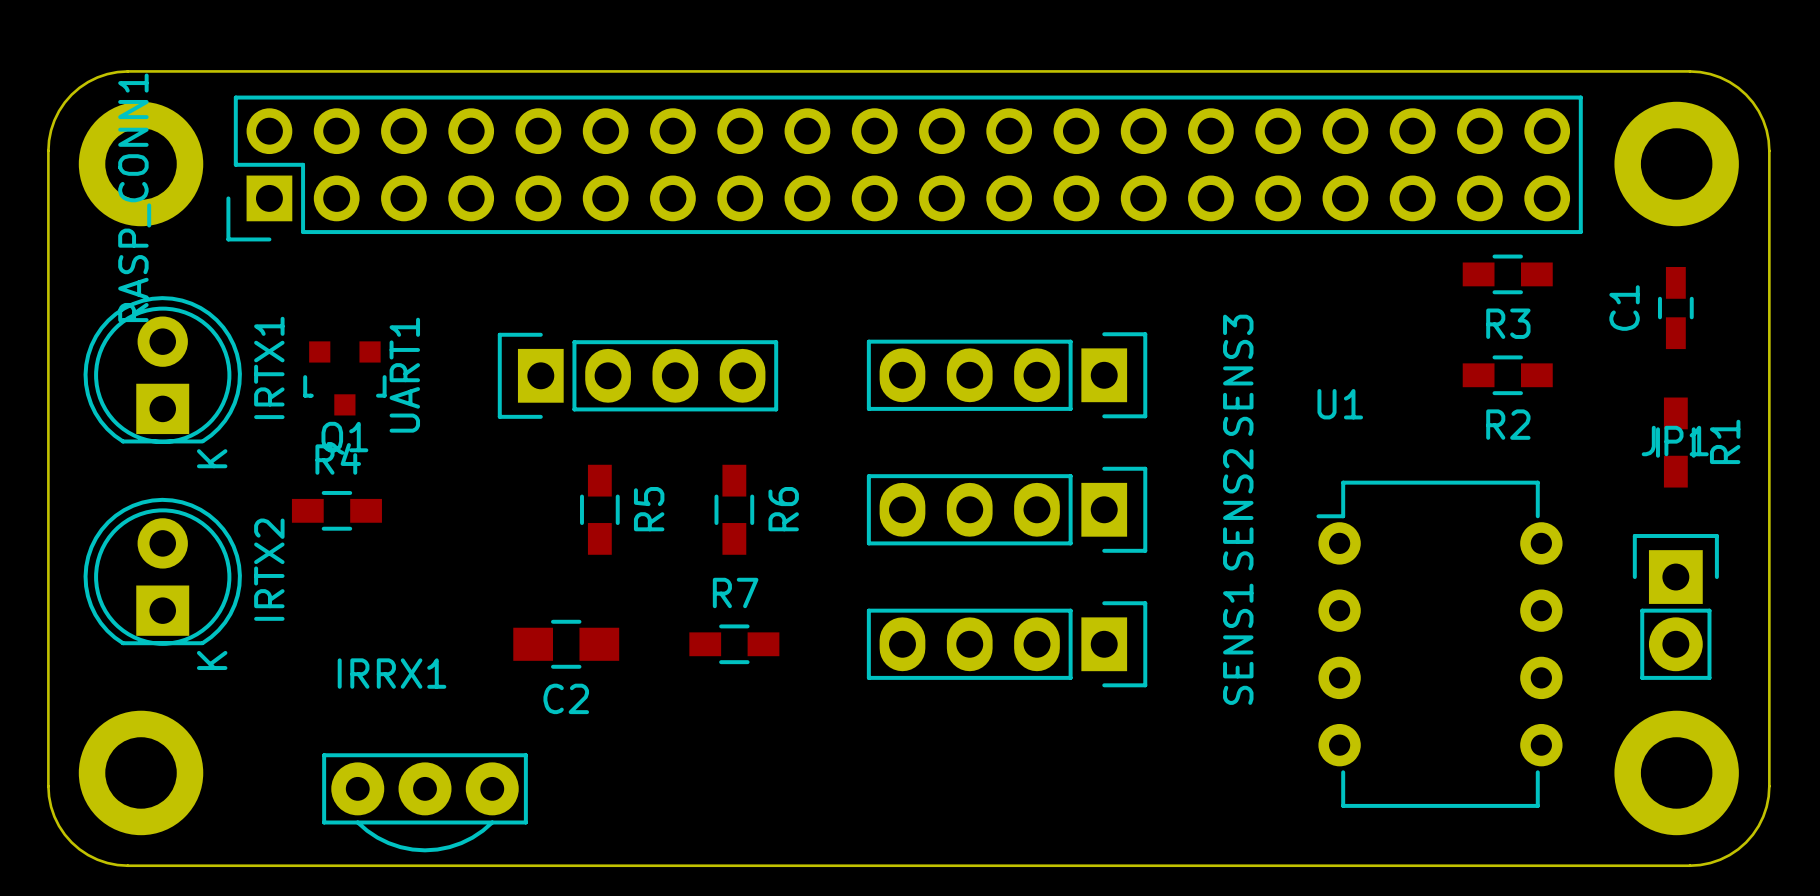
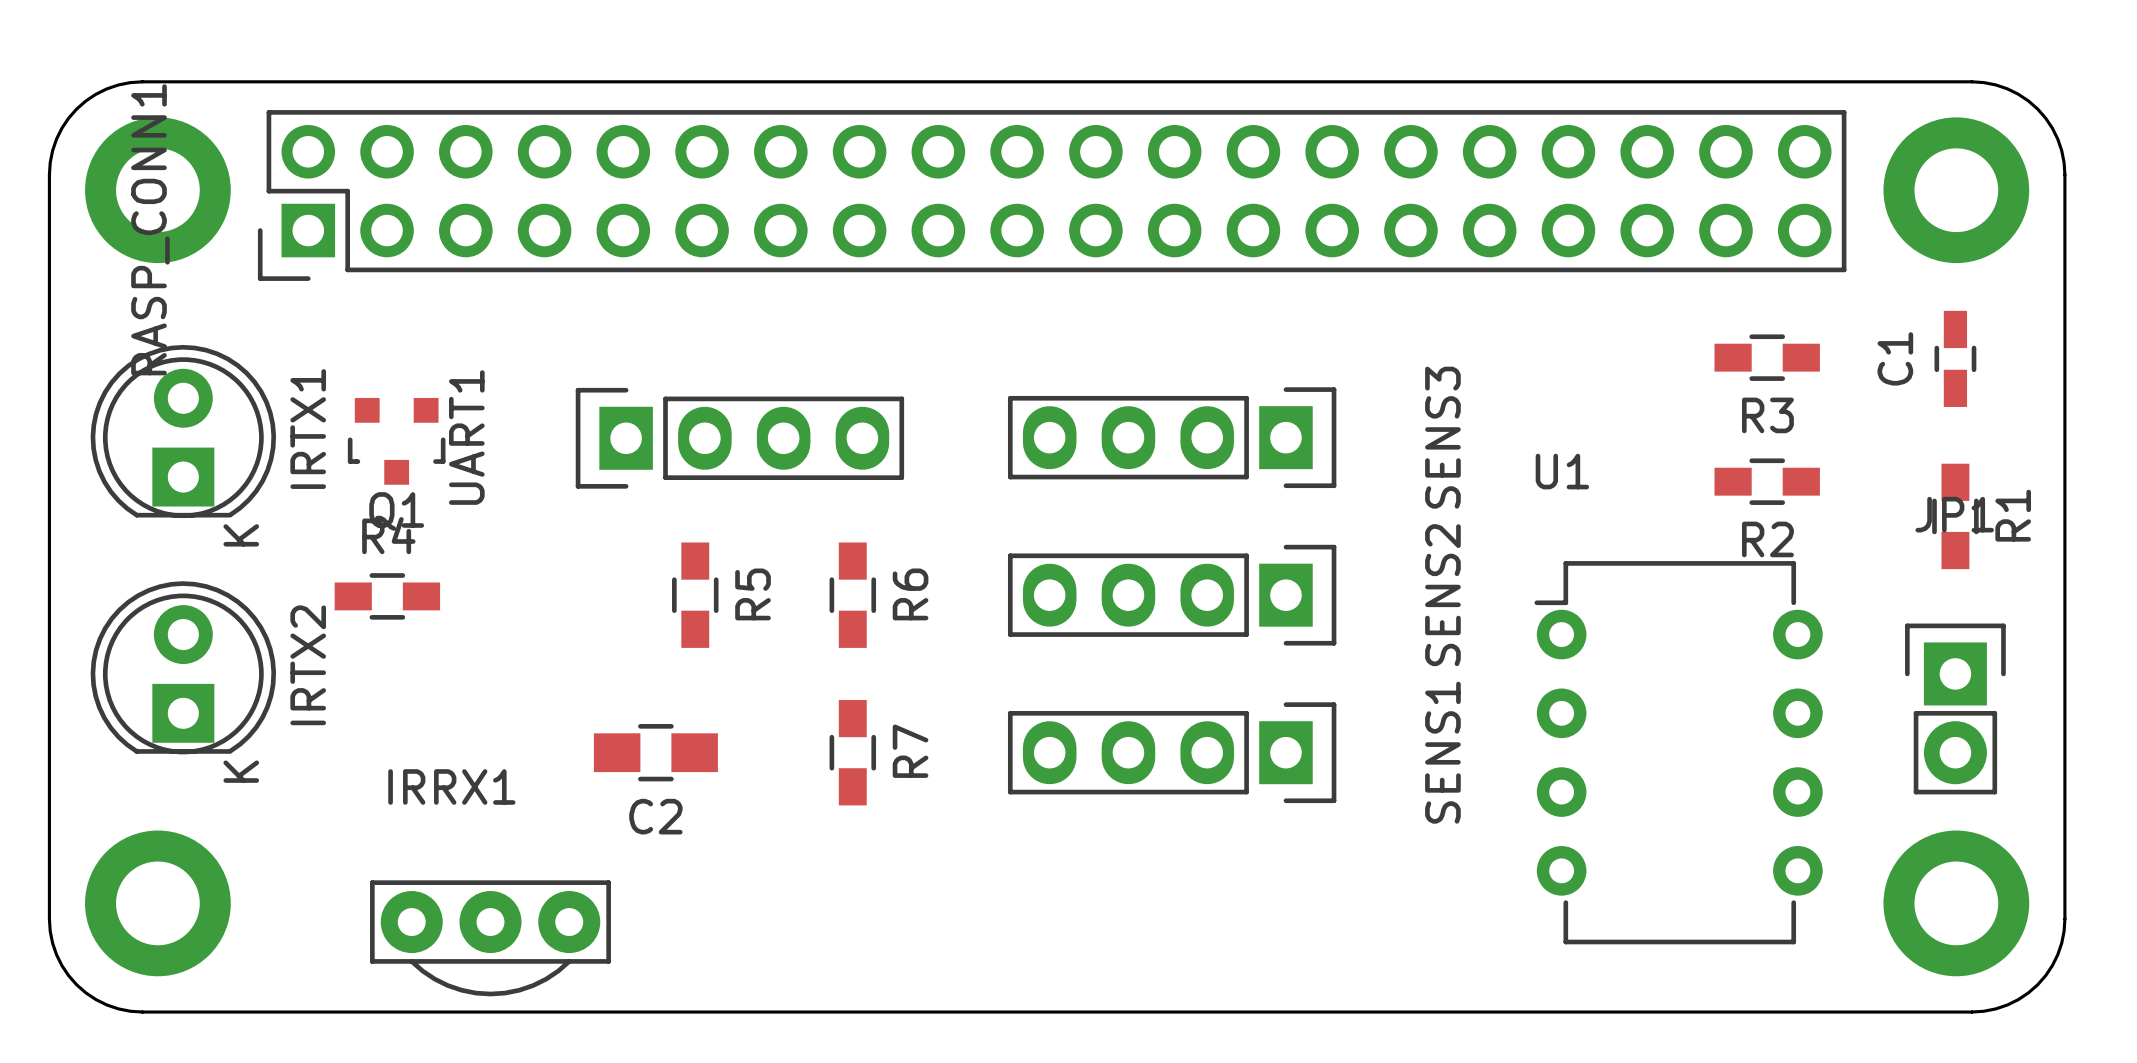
R3 position: (1507, 274) -> (1767, 357)
R2 position: (1507, 375) -> (1767, 481)
R7 rotation: 0° (734, 644) -> 90° clockwise (852, 752)

